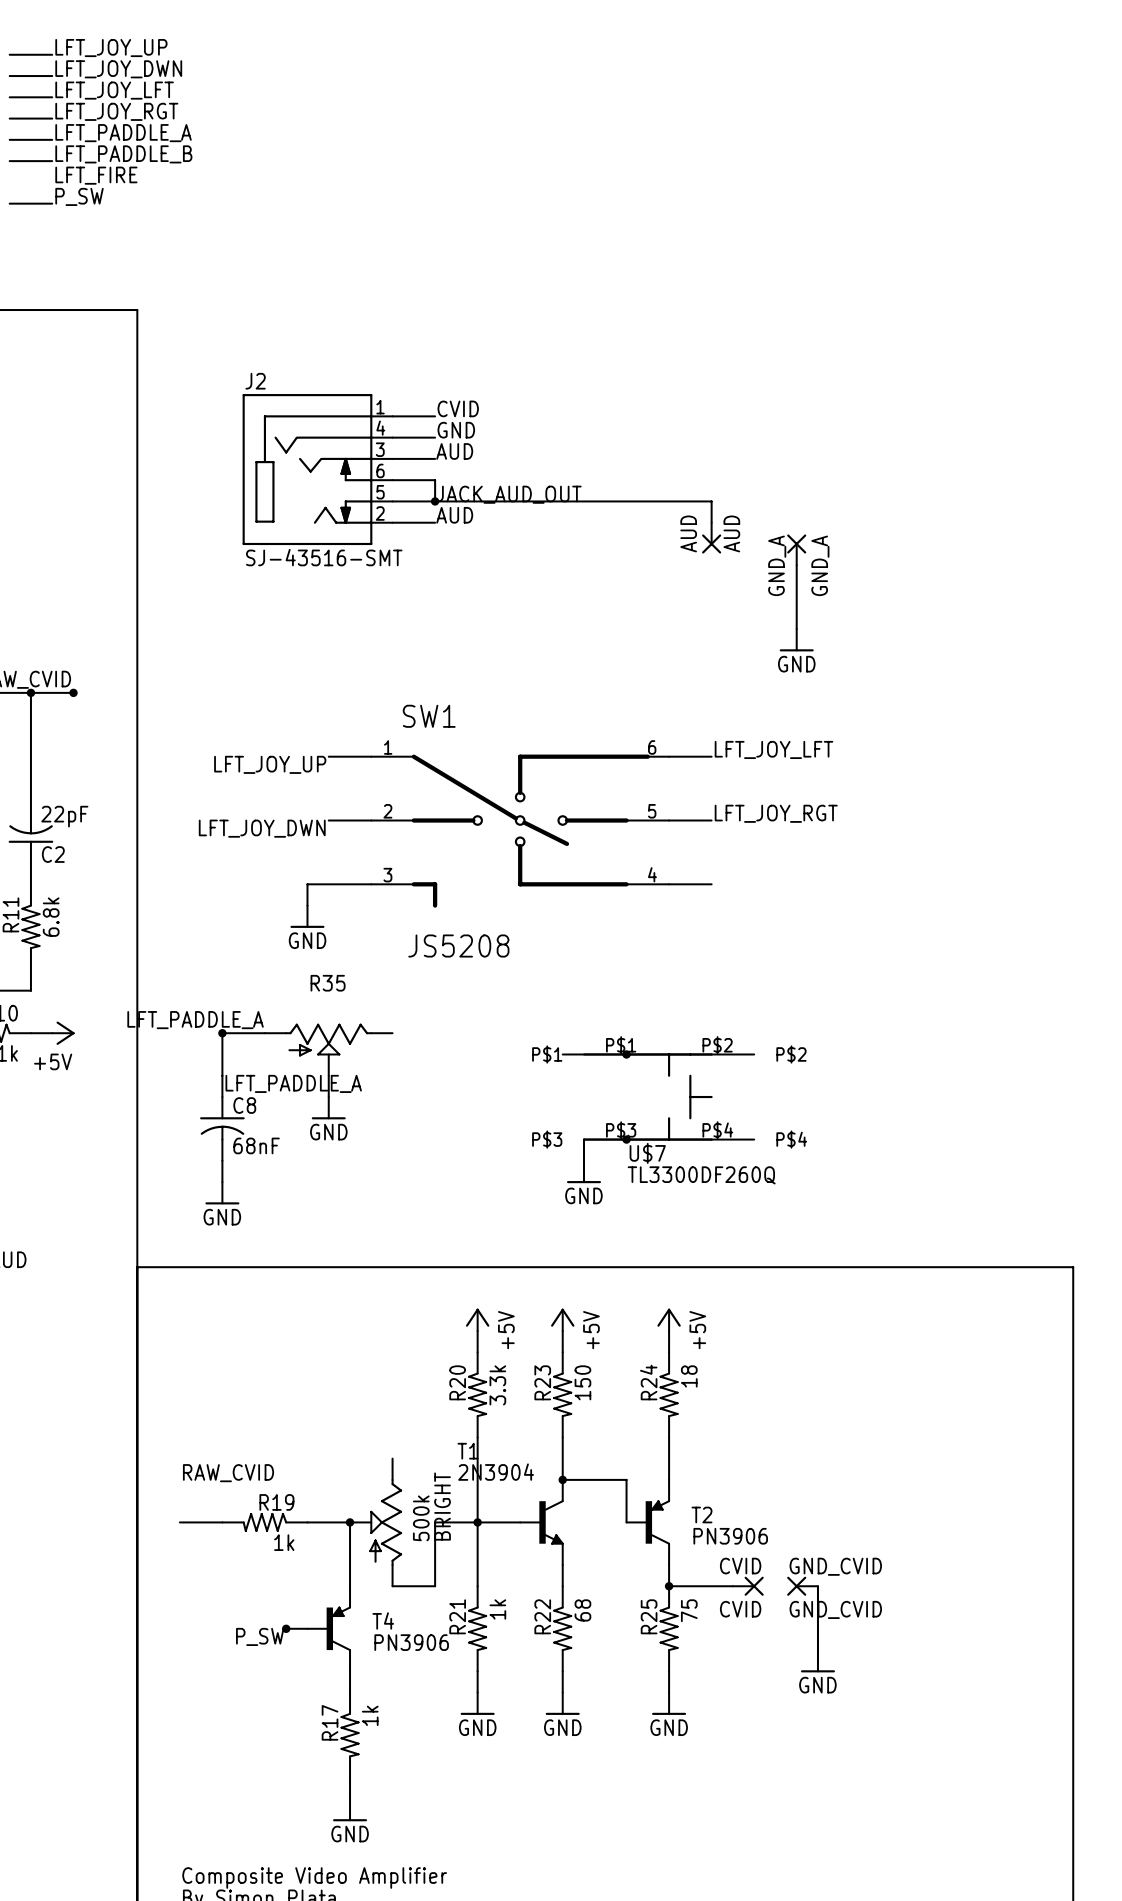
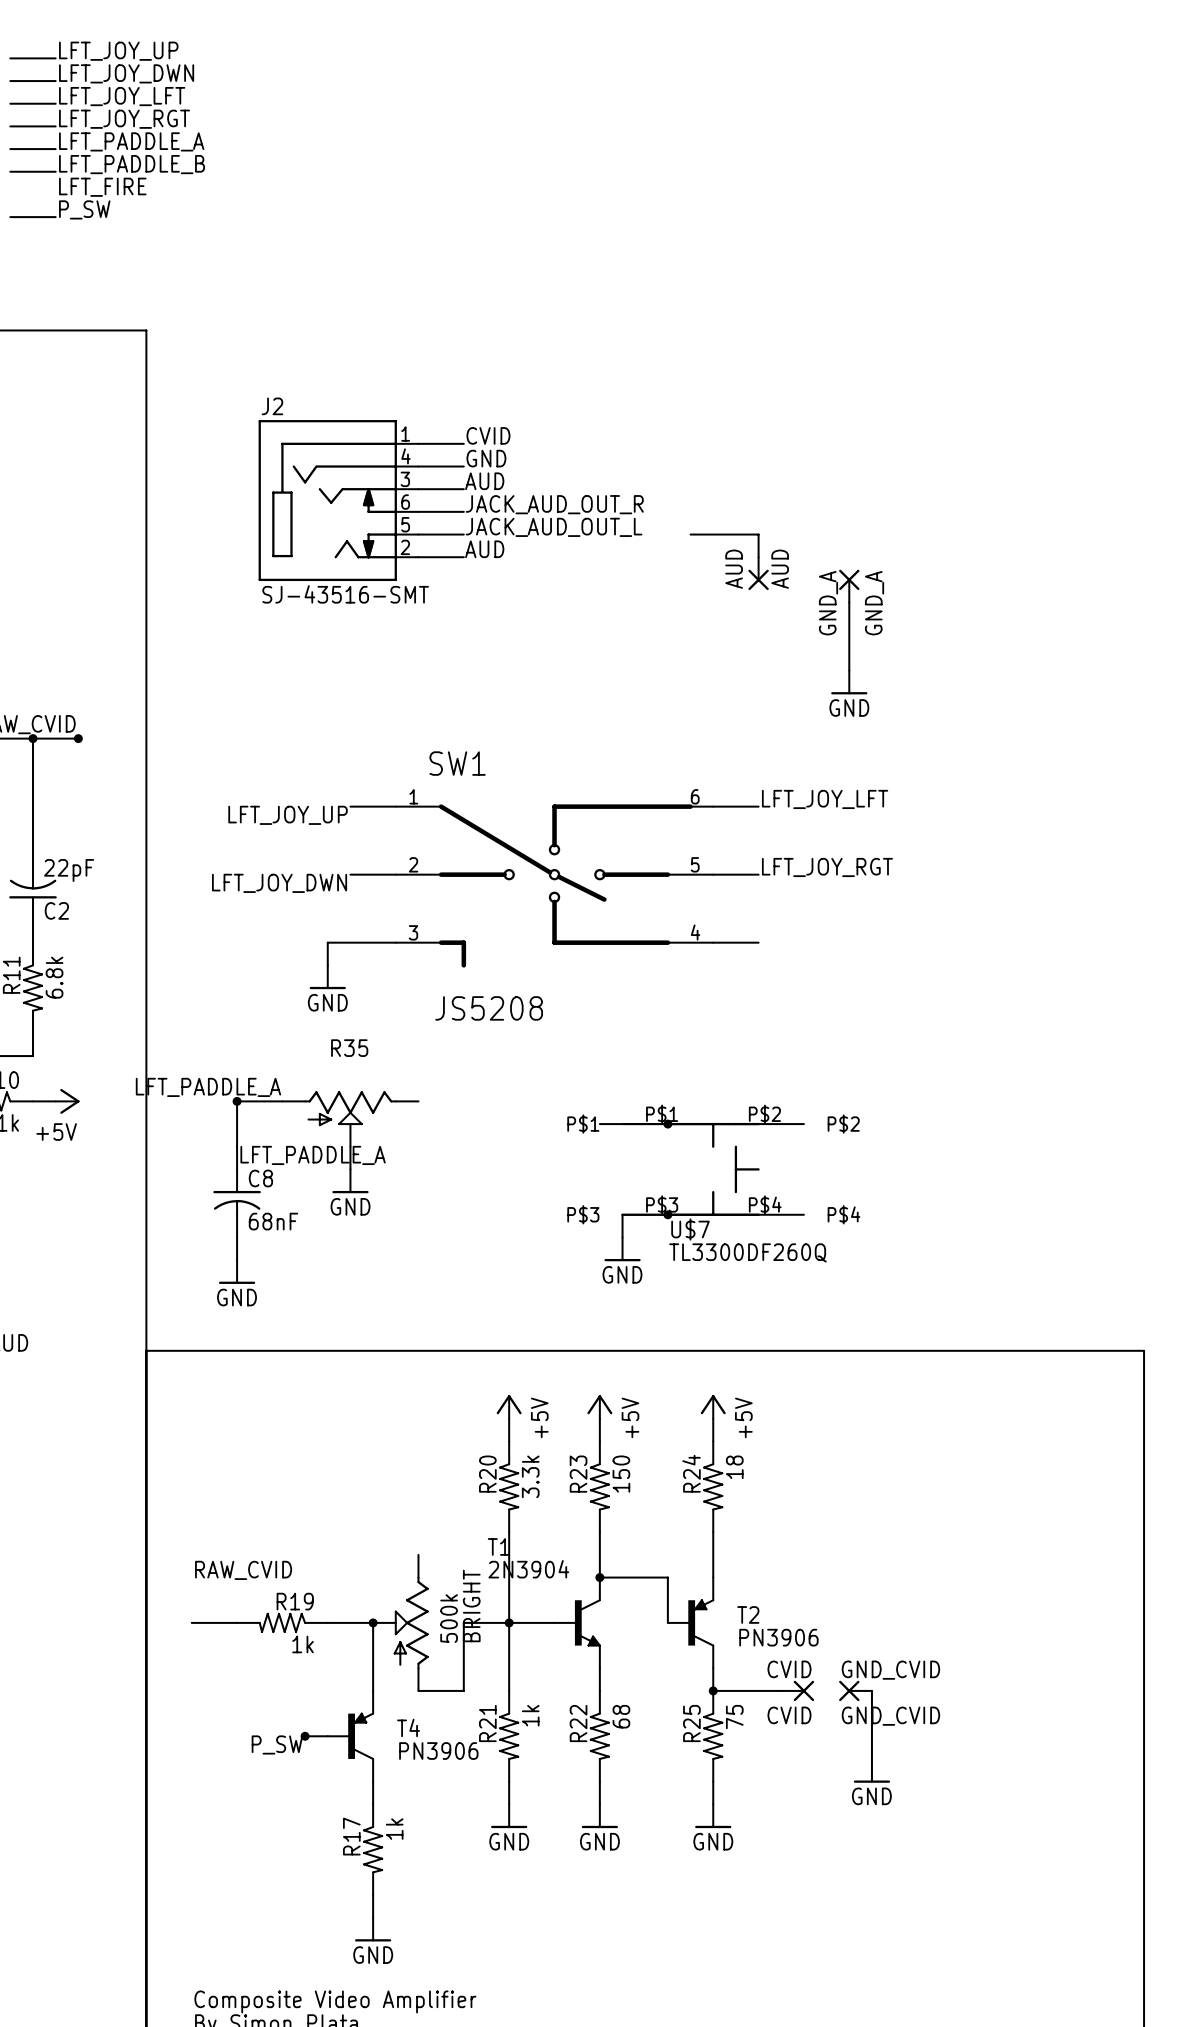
label: none -> JACK_AUD_OUT_R (554, 504)
wire: (435, 480) (435, 501) (647, 501) -> none
label: JACK_AUD_OUT (509, 494) -> JACK_AUD_OUT_L (554, 527)
junction: (435, 501) -> none

